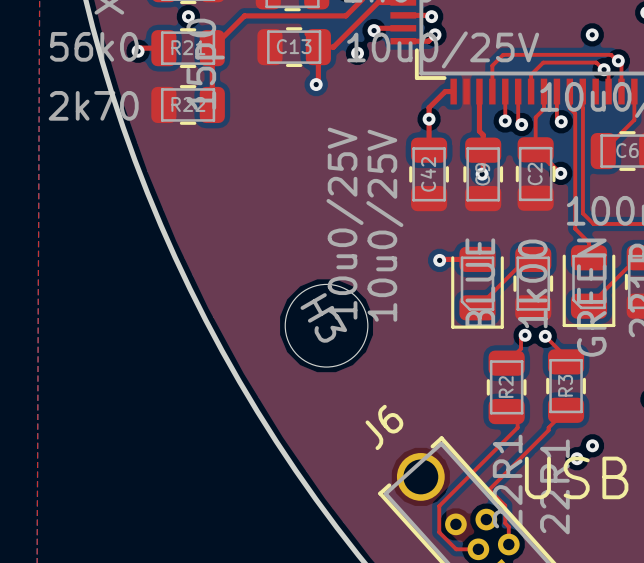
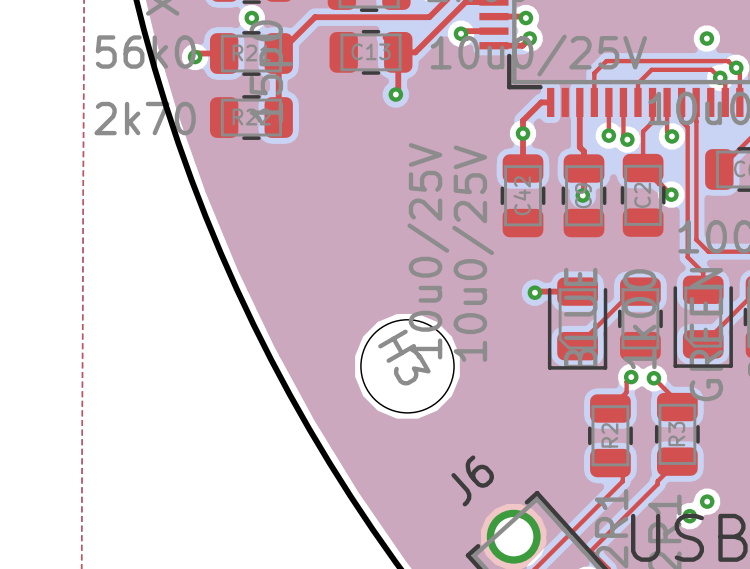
via: (357, 53) -> none

